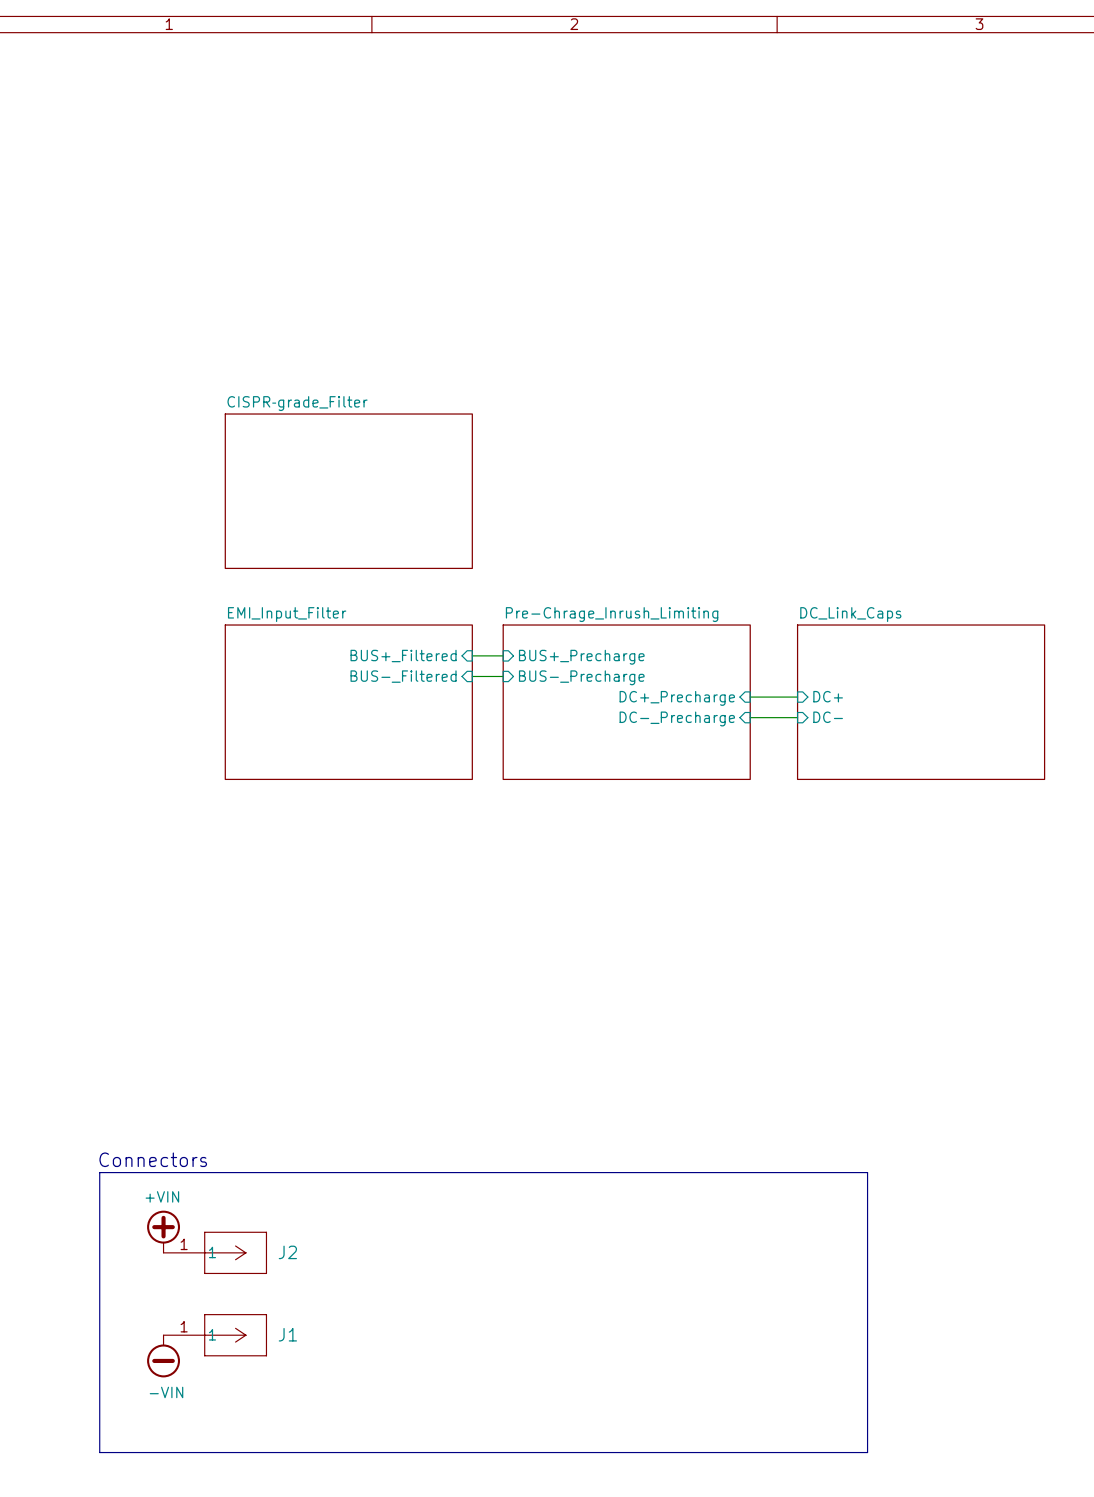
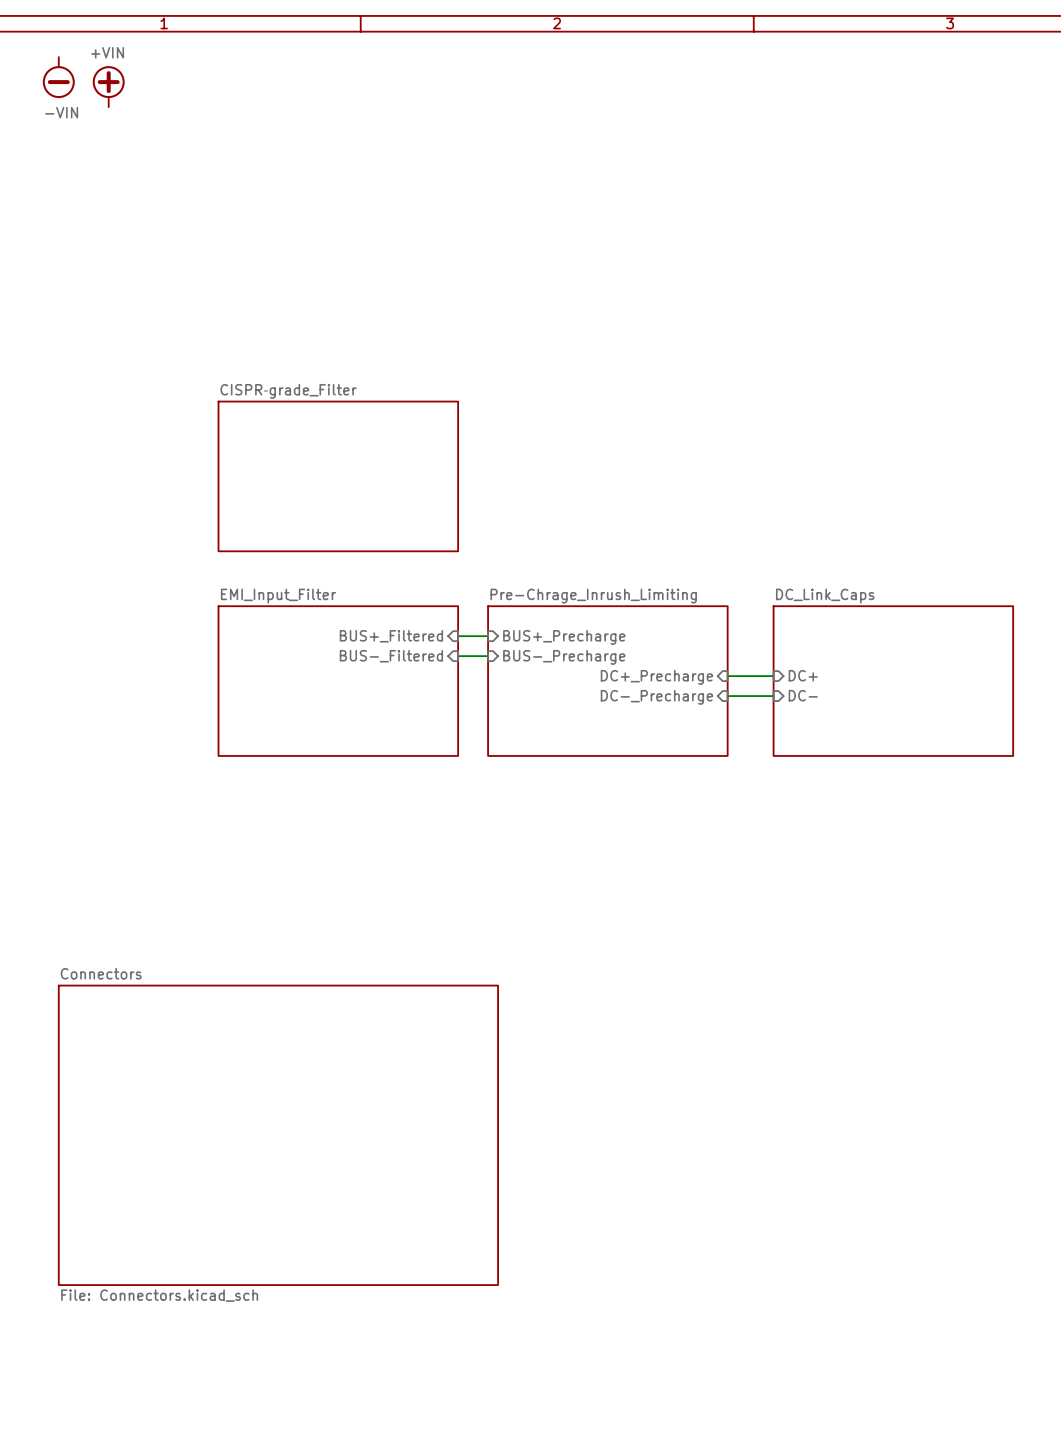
power symbol: none -> -VIN (58, 77)
power symbol: none -> +VIN (108, 86)
text: Connectors (153, 1159) -> none
sheet Connectors: none -> File: Connectors.kicad_sch (278, 1135)
line: (99, 1172) (867, 1172) (867, 1452) (99, 1452) (99, 1172) -> none
power symbol: +VIN (163, 1231) -> none
J2: (215, 1252) -> none
J1: (215, 1335) -> none
power symbol: -VIN (163, 1356) -> none

